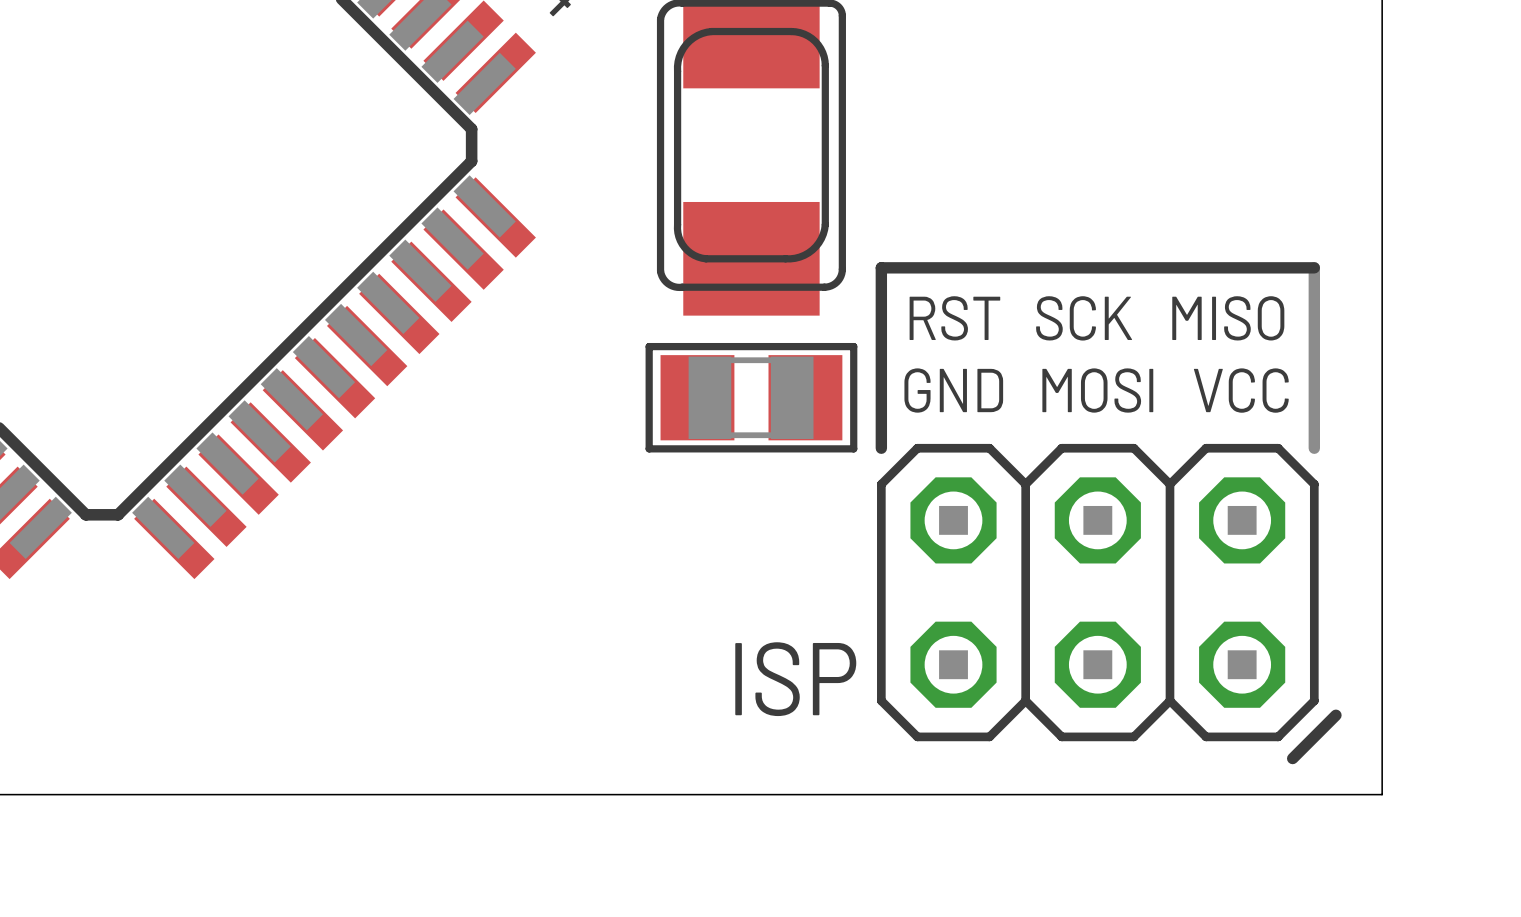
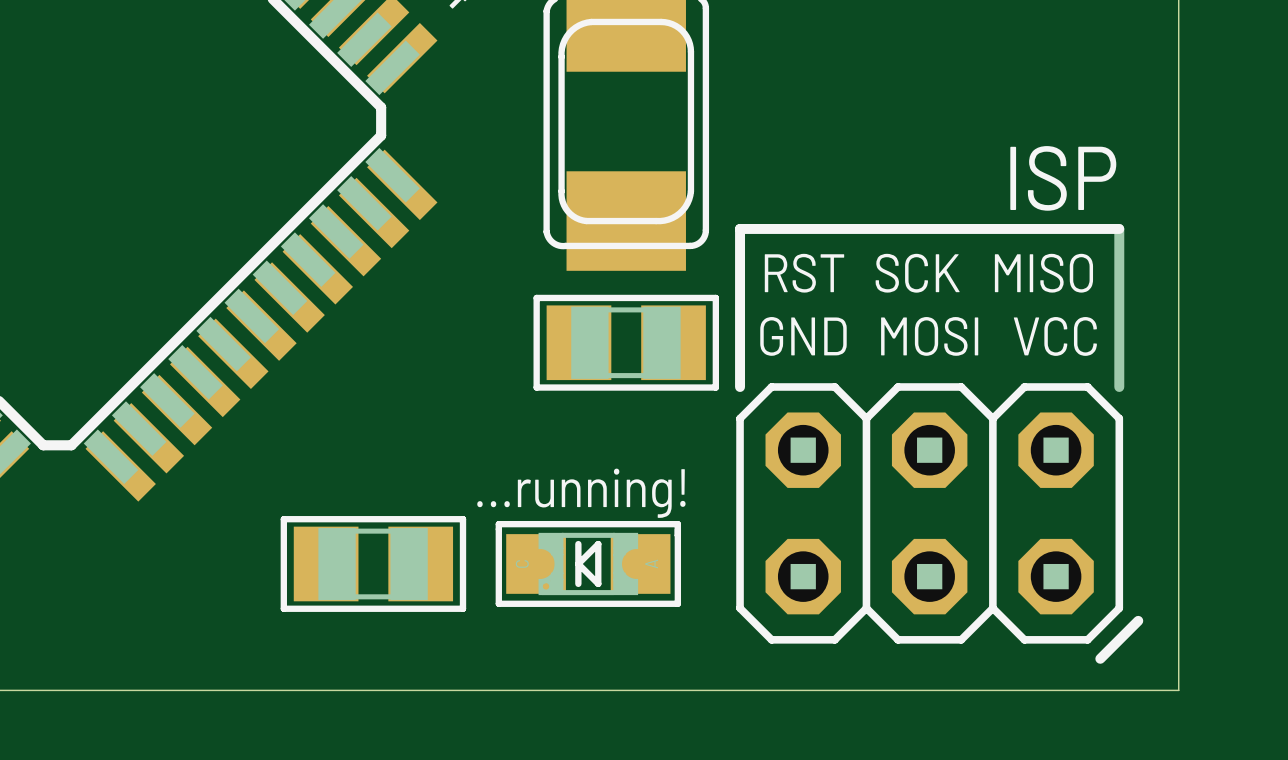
text: none -> ...running! (581, 493)
part: none -> (373, 563)
part: none -> (588, 563)
ISP name position: ISP (795, 679) -> ISP (1063, 178)

